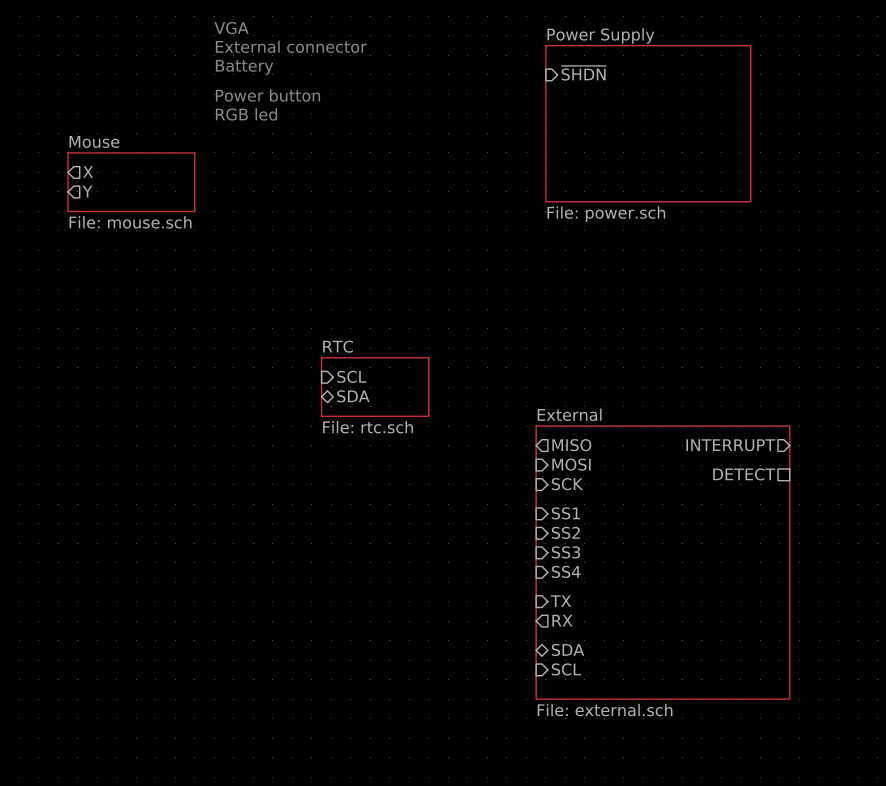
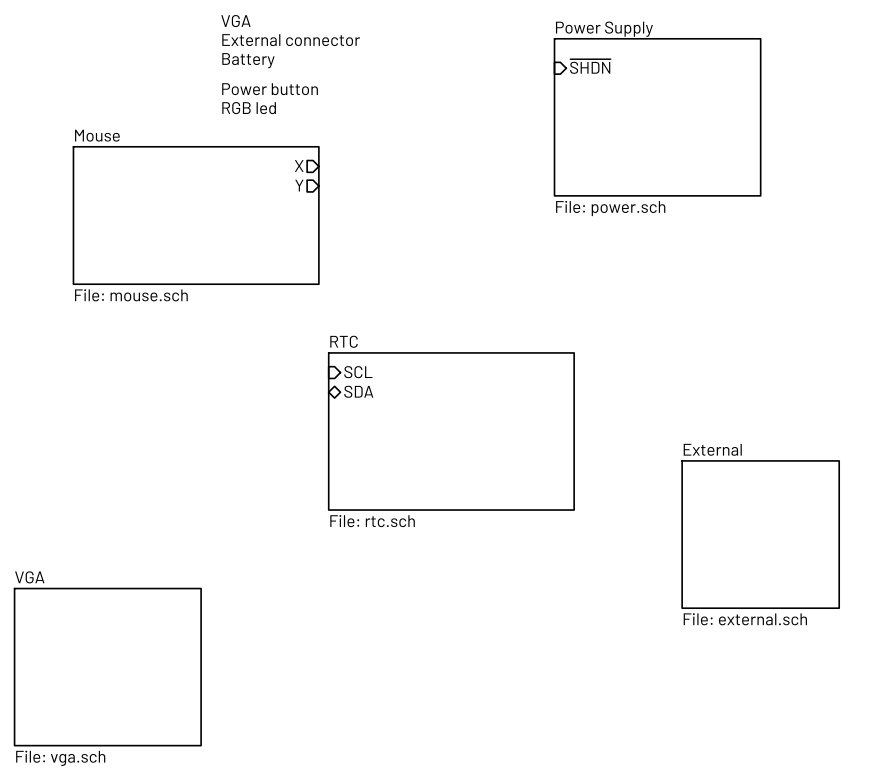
sheet pin: X (88, 172) -> none
sheet pin: none -> X (299, 165)
sheet Mouse: File: mouse.sch (131, 182) -> none
sheet pin: Y (87, 191) -> none
sheet pin: none -> Y (299, 185)
sheet Mouse: none -> File: mouse.sch (196, 215)
sheet RTC: File: rtc.sch (375, 387) -> none
sheet RTC: none -> File: rtc.sch (451, 431)
sheet pin: MISO (571, 445) -> none
sheet pin: INTERRUPT (730, 445) -> none
sheet pin: MOSI (571, 464) -> none
sheet pin: DETECT (744, 474) -> none
sheet pin: SCK (567, 484) -> none
sheet pin: SS1 (565, 513) -> none
sheet pin: SS2 (565, 532) -> none
sheet External: none -> File: external.sch (760, 534)
sheet pin: SS3 (565, 552) -> none
sheet External: File: external.sch (662, 562) -> none
sheet pin: SS4 (566, 571) -> none
sheet pin: TX (560, 601) -> none
sheet pin: RX (562, 620) -> none
sheet pin: SDA (568, 649) -> none
sheet VGA: none -> File: vga.sch (107, 667)
sheet pin: SCL (566, 669) -> none

